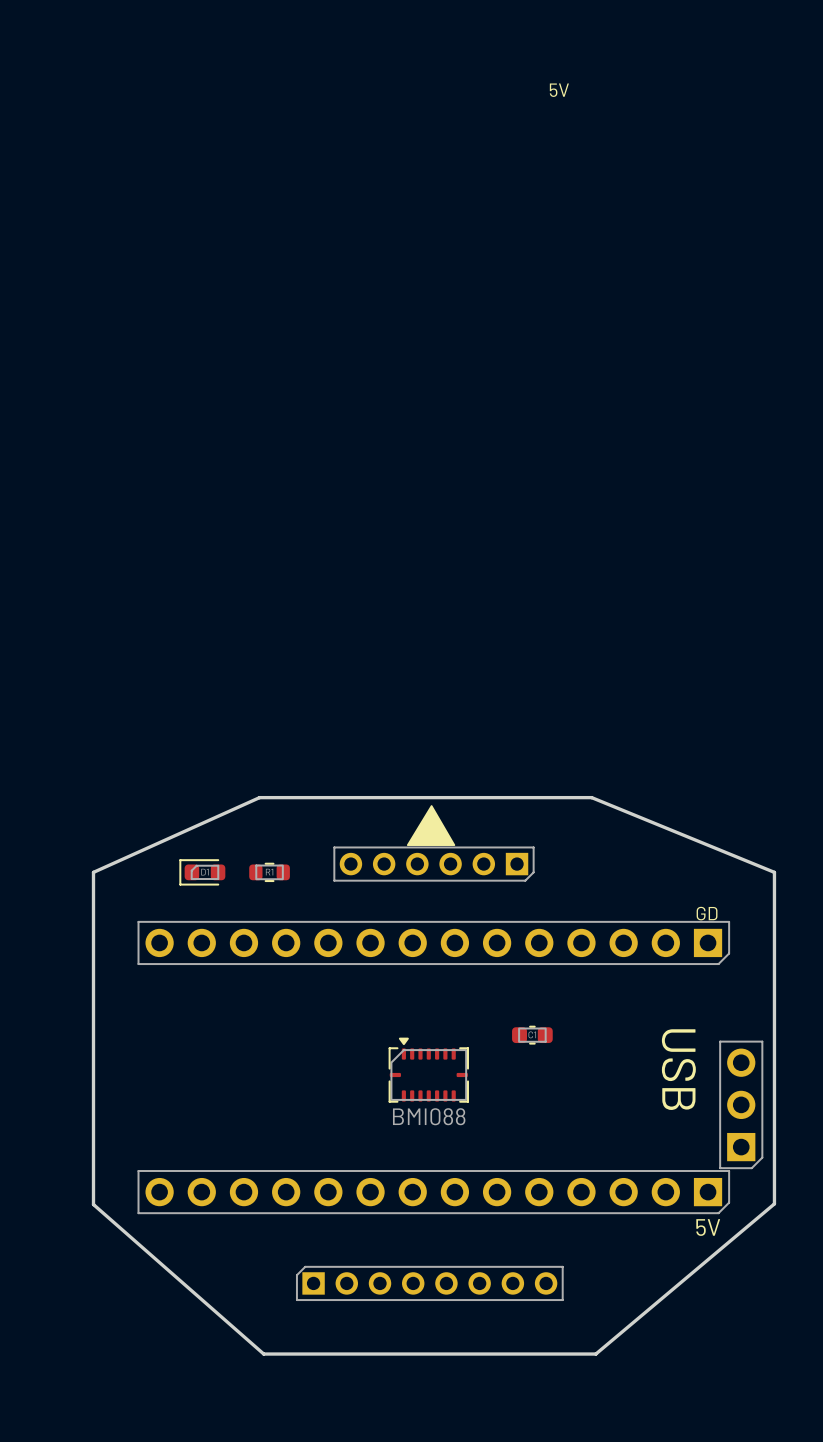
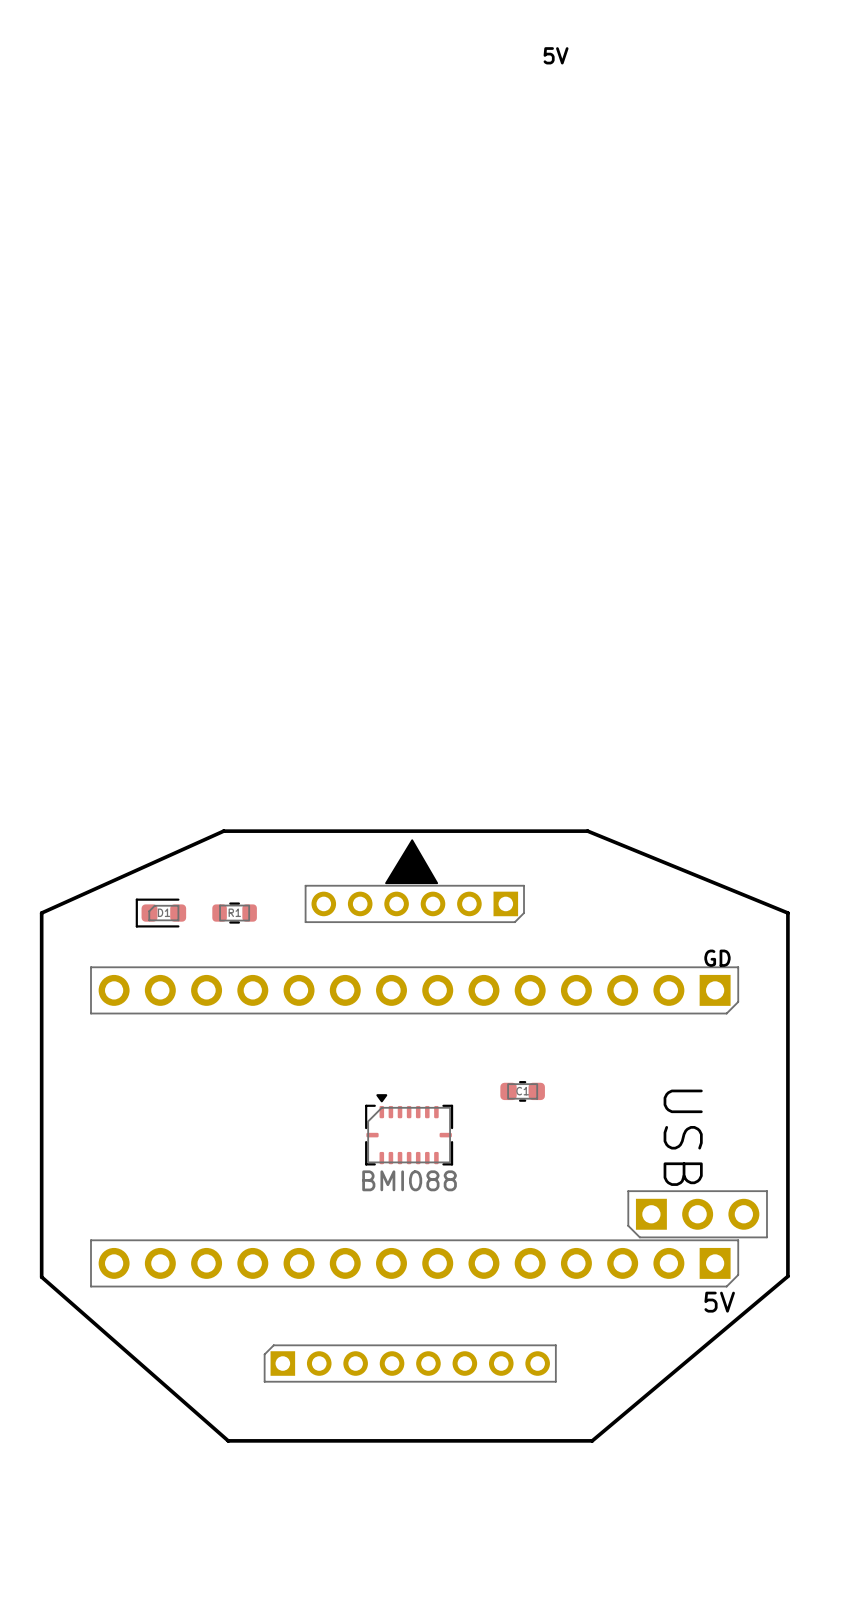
part rotation: 0° (741, 1104) -> 90° clockwise (697, 1214)

